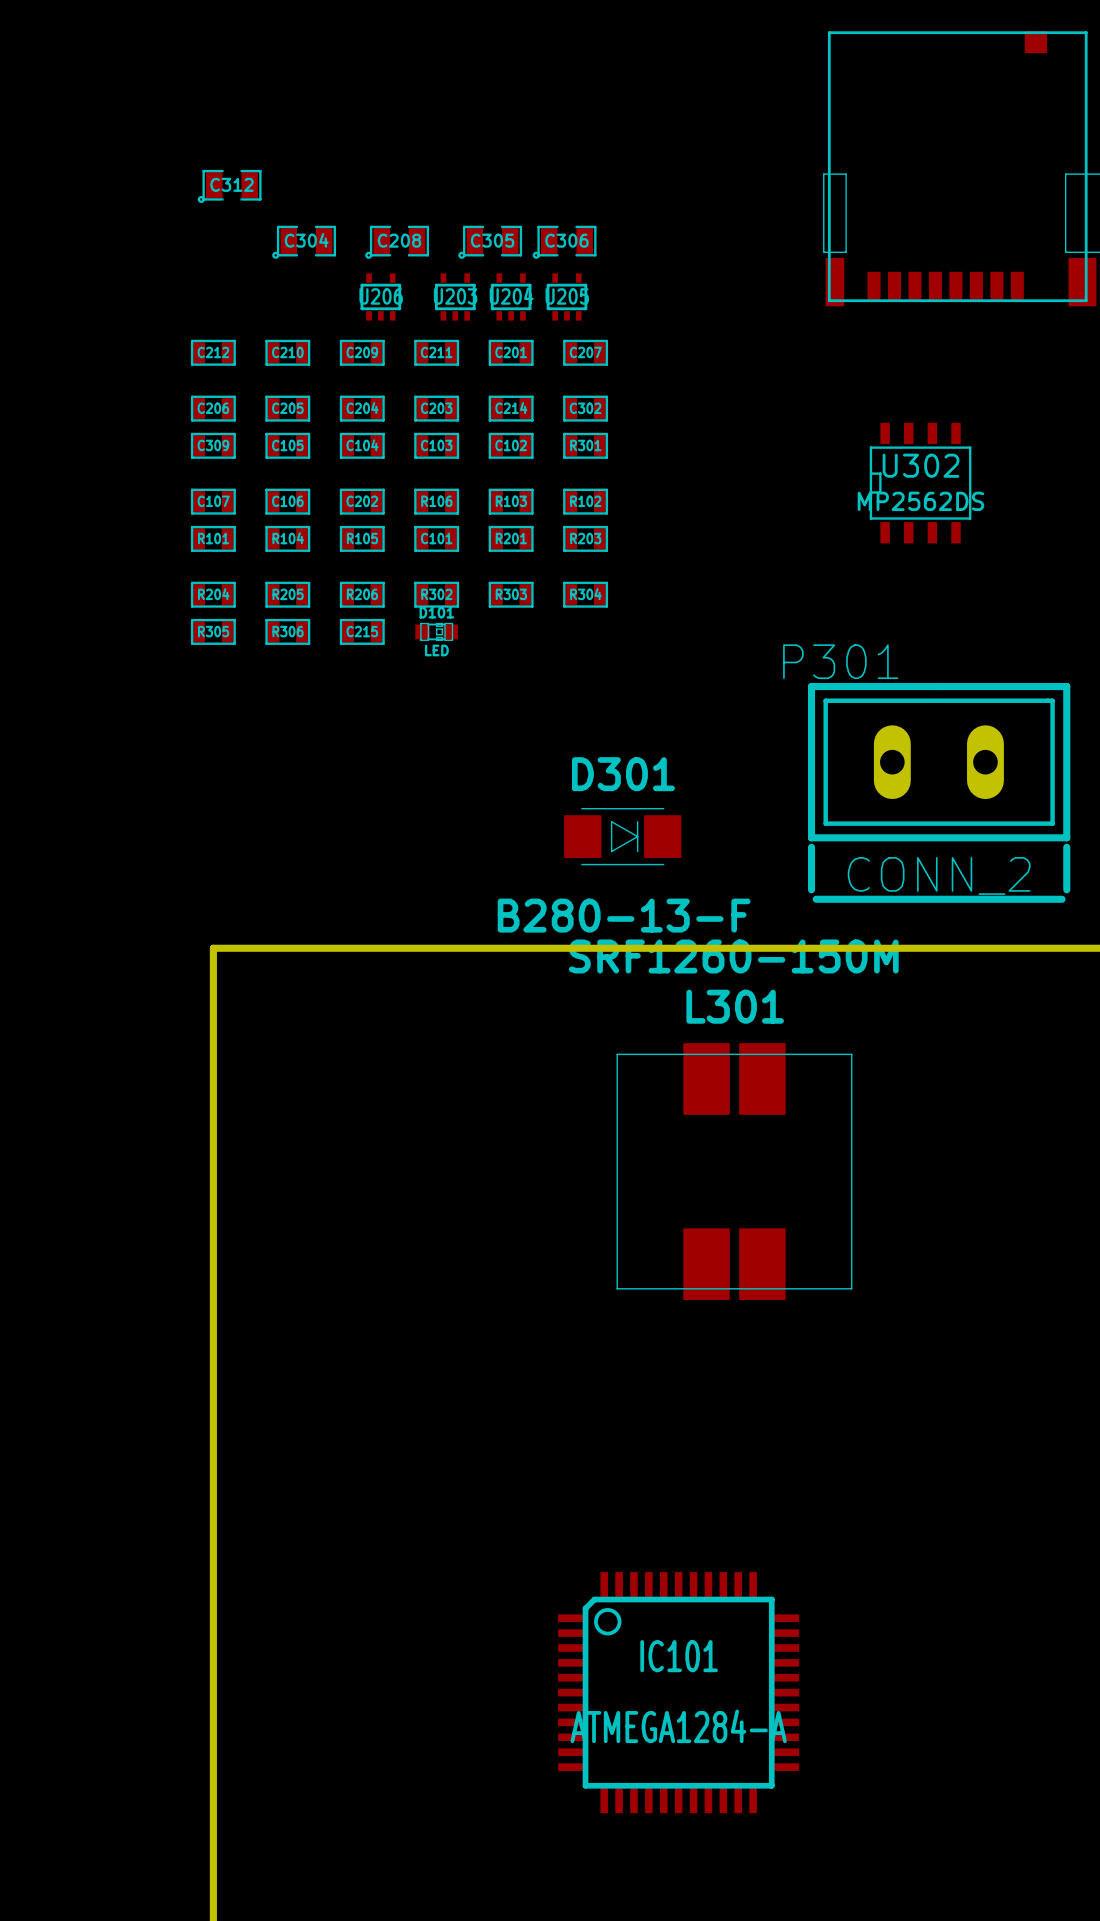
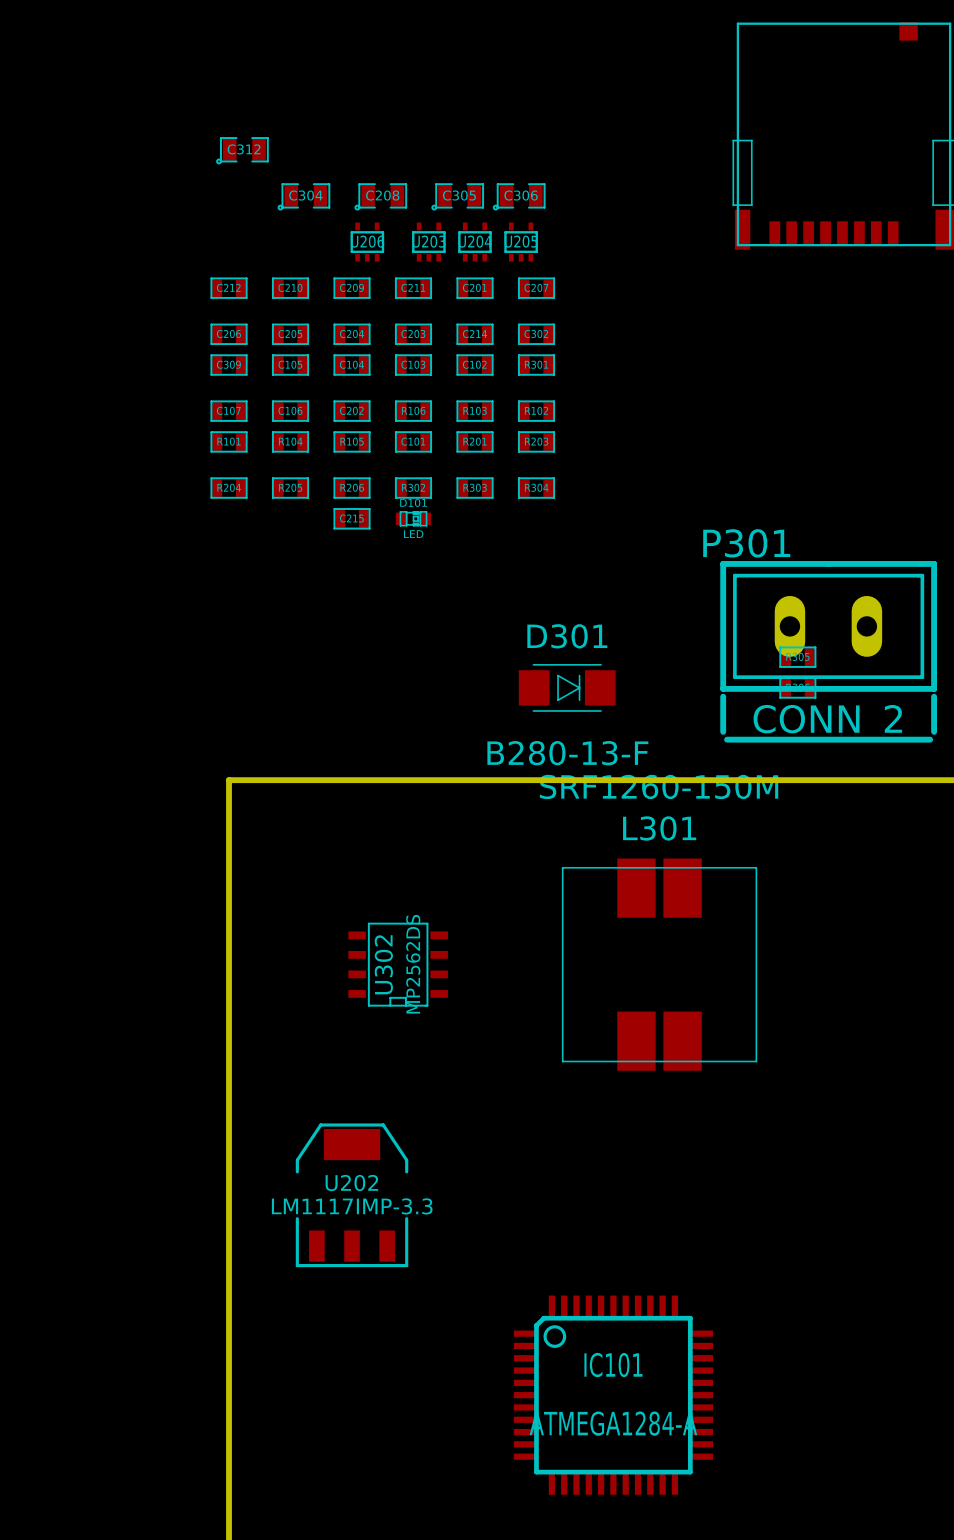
U302 rotation: 0° (920, 483) -> 90° counterclockwise (398, 964)
U302 position: (920, 483) -> (398, 964)
R305 position: (213, 631) -> (797, 657)
R306 position: (287, 631) -> (797, 687)
U202: none -> LM1117IMP-3.3 (352, 1195)

